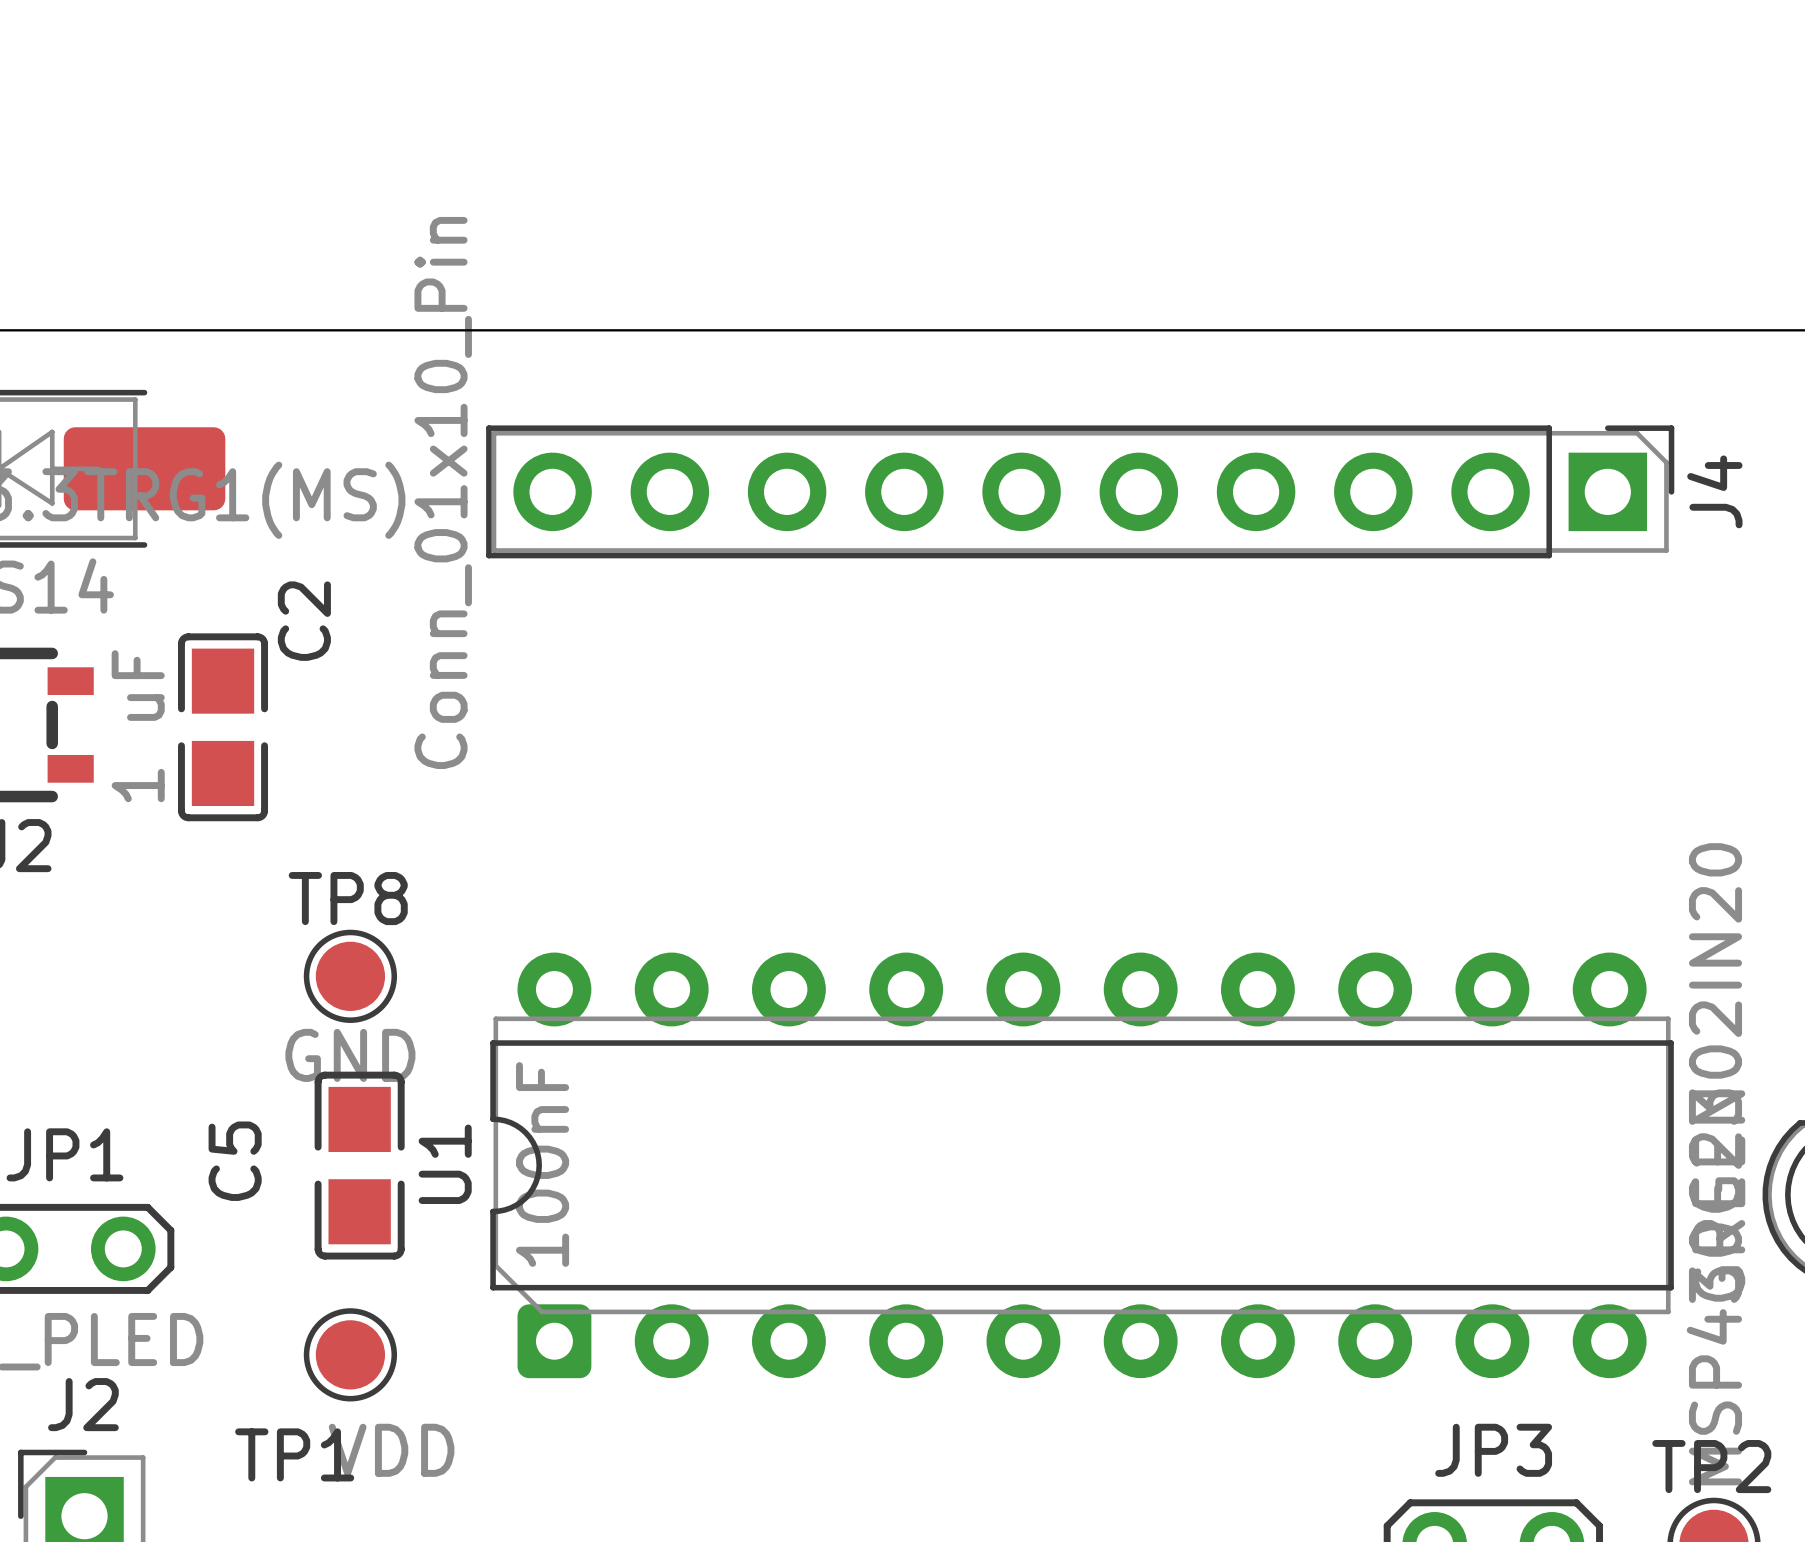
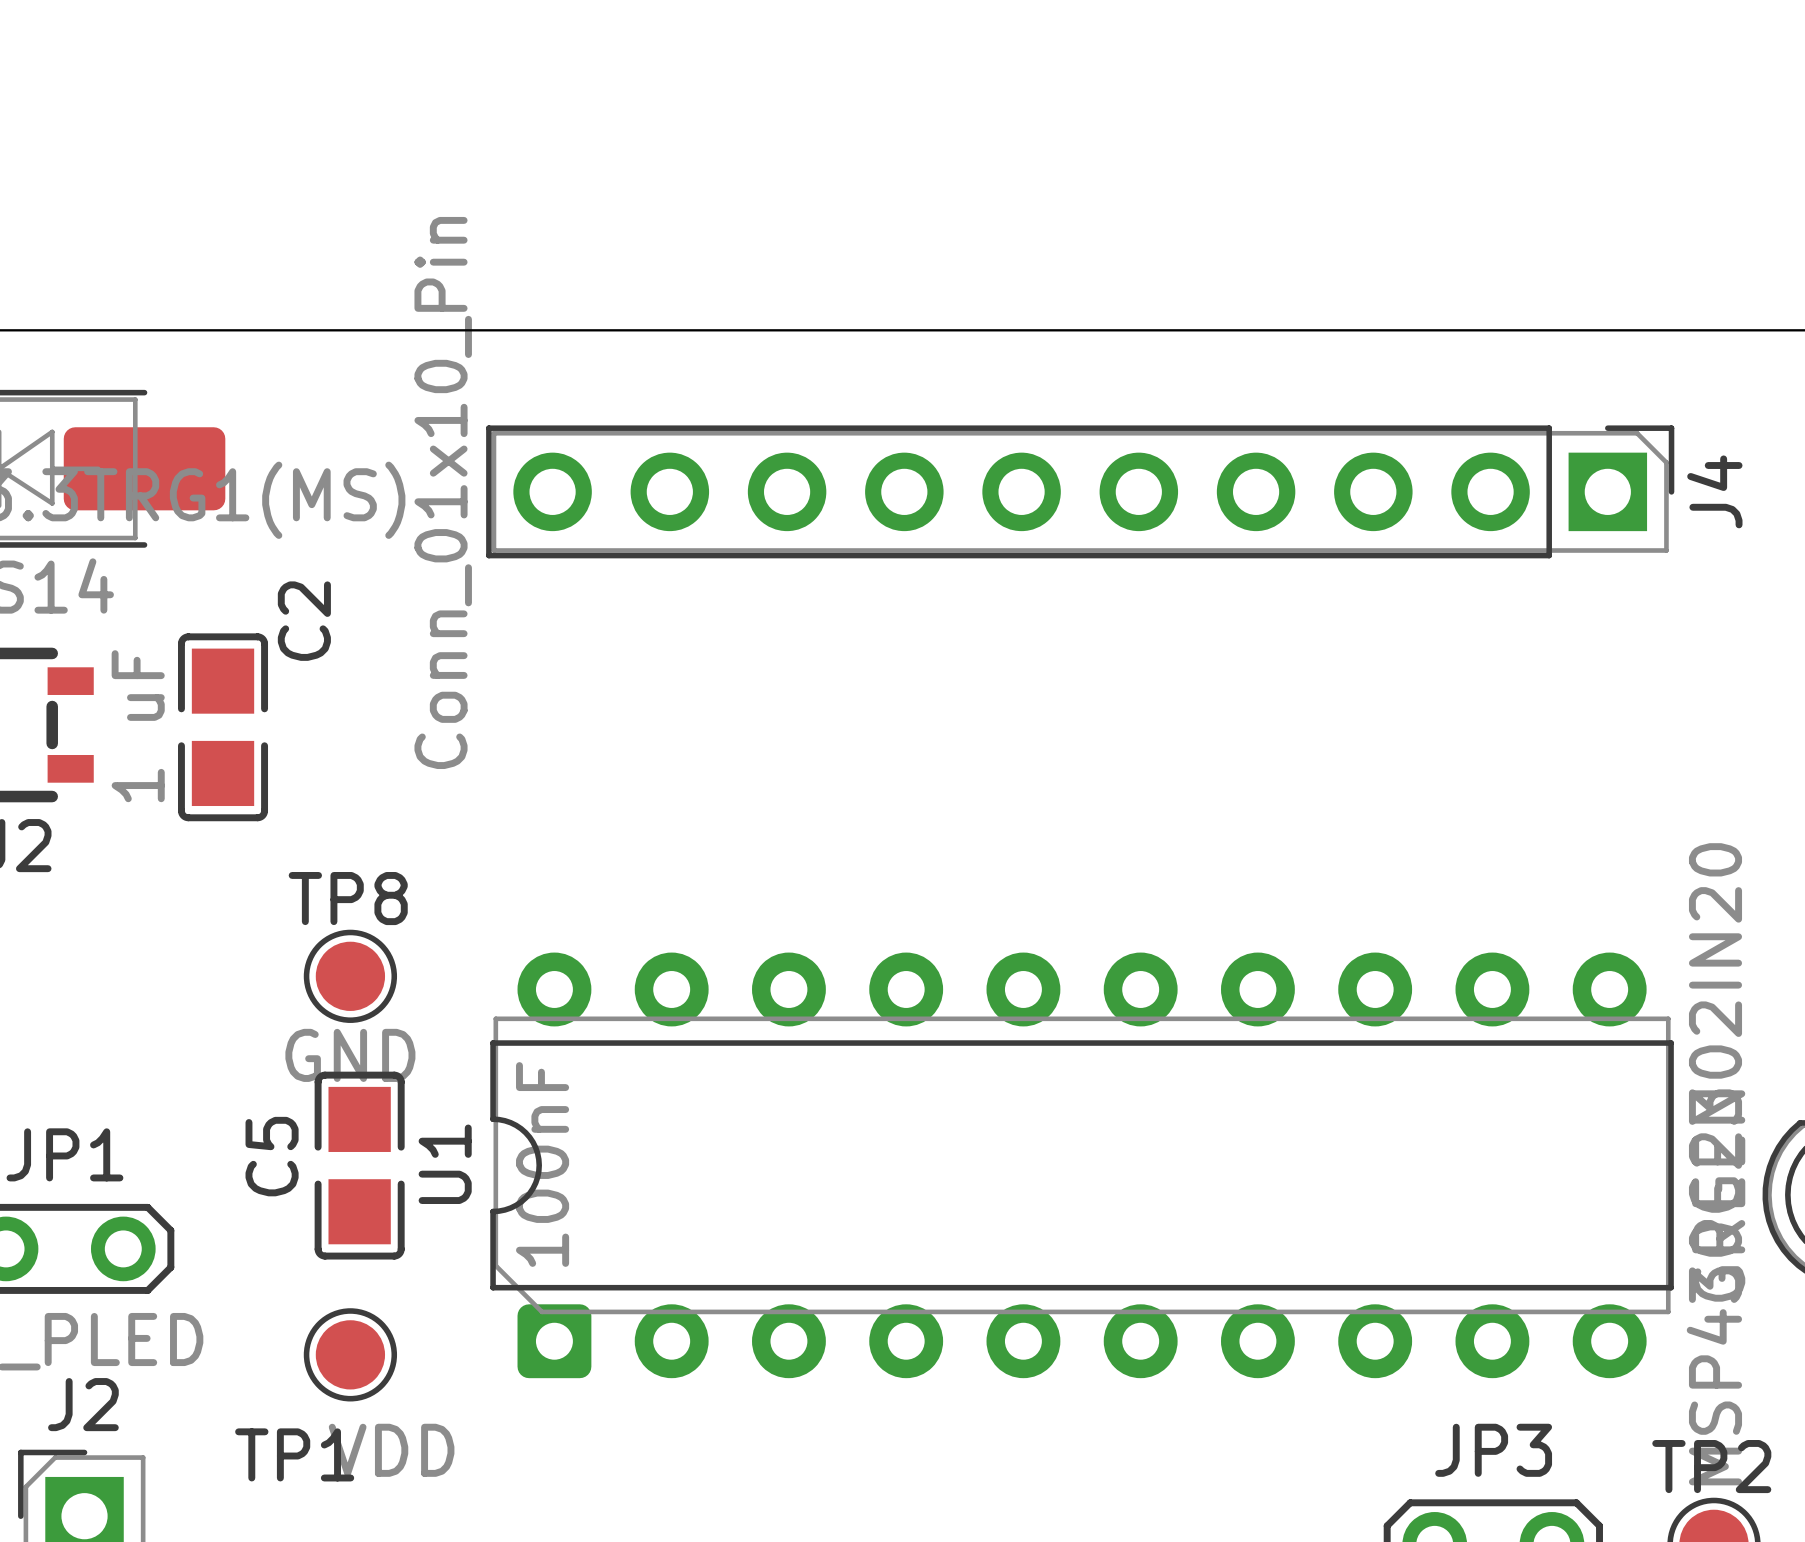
C5 name position: C5 (235, 1161) -> C5 (272, 1156)

